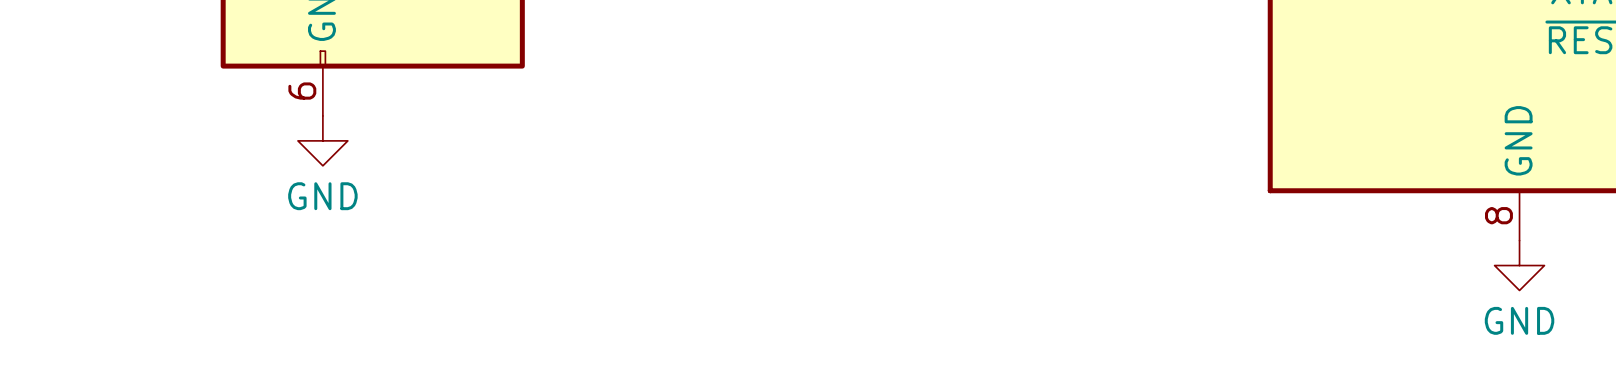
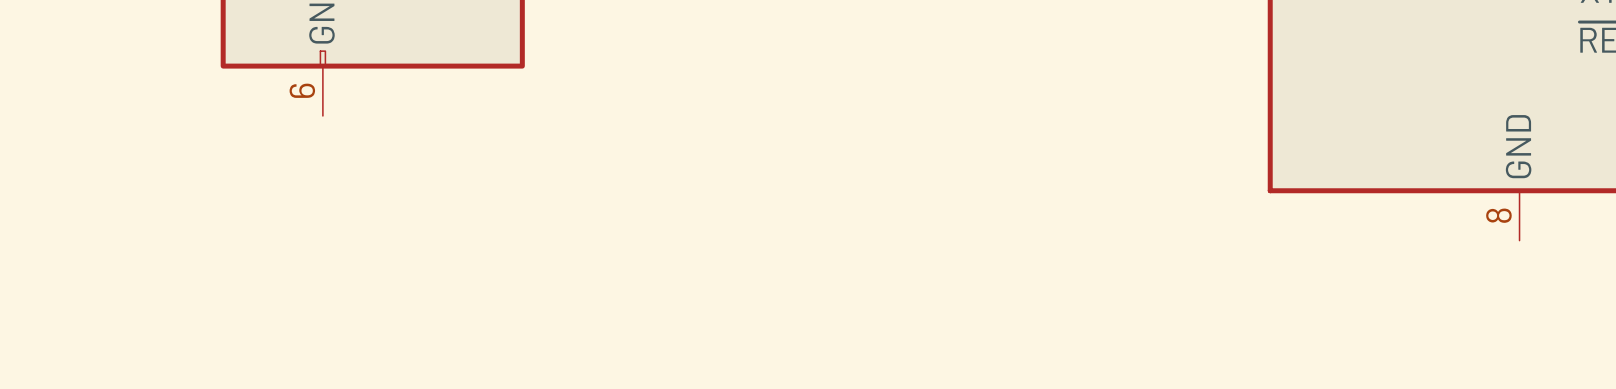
power symbol: GND (322, 140) -> none
power symbol: GND (1519, 265) -> none

